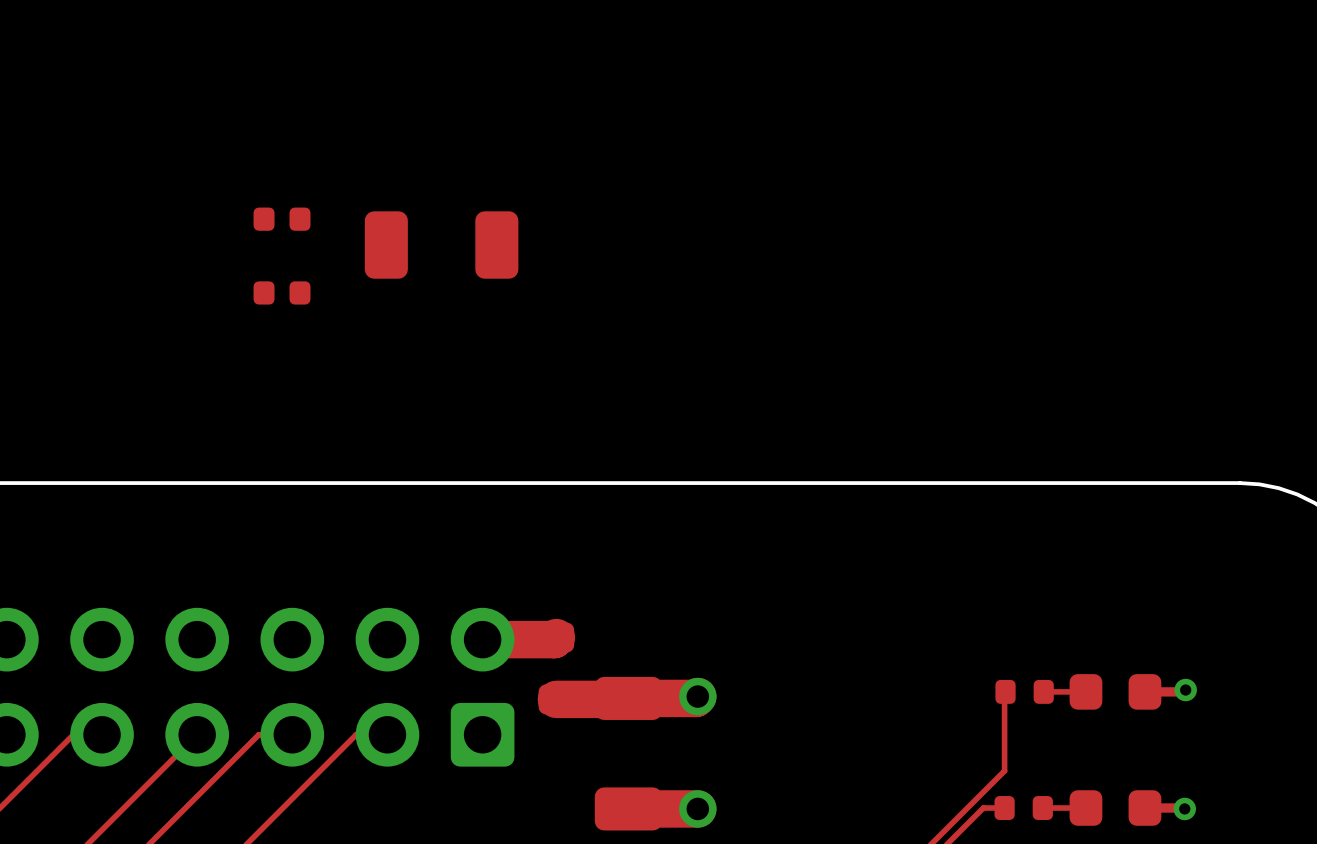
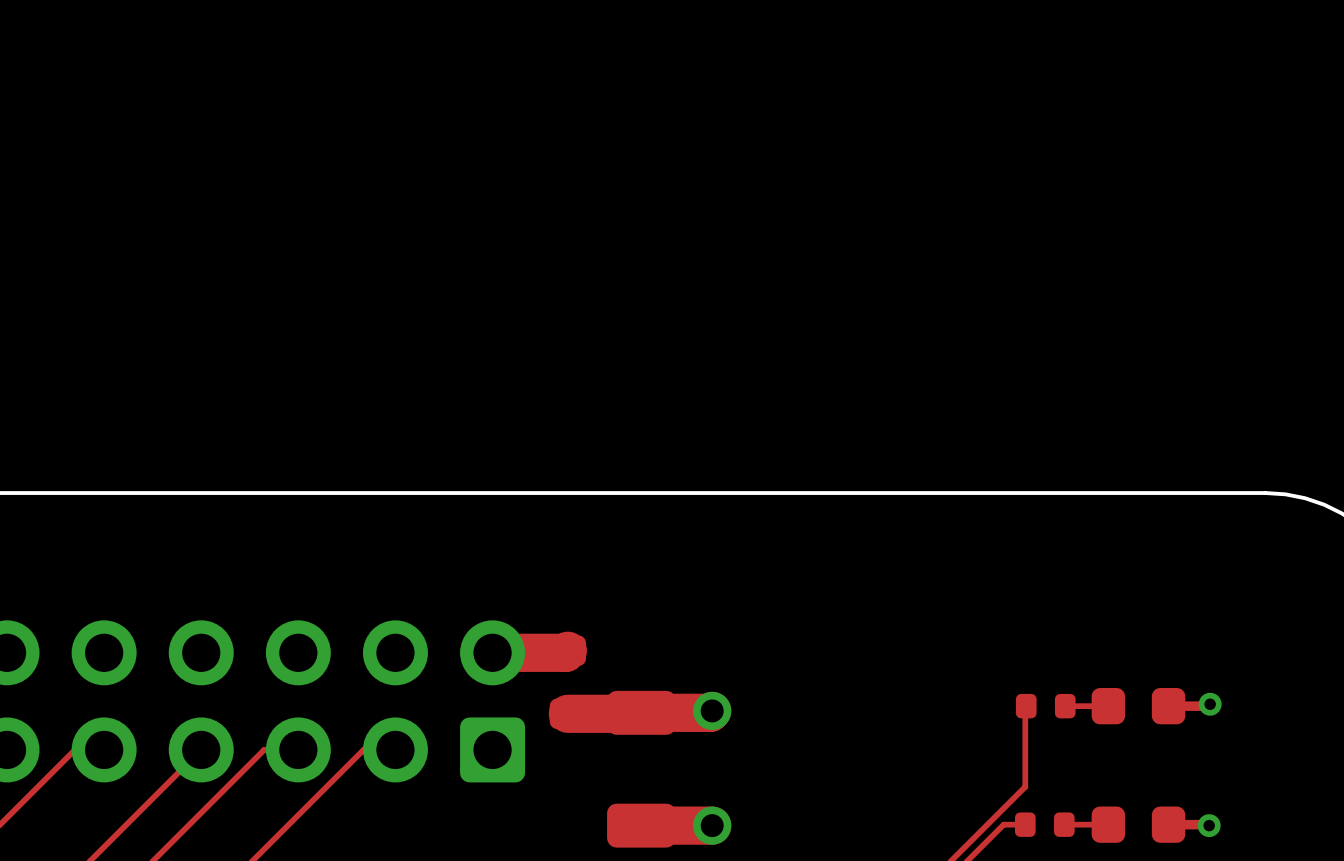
part: (282, 219) -> none
part: (441, 245) -> none
part: (282, 292) -> none

